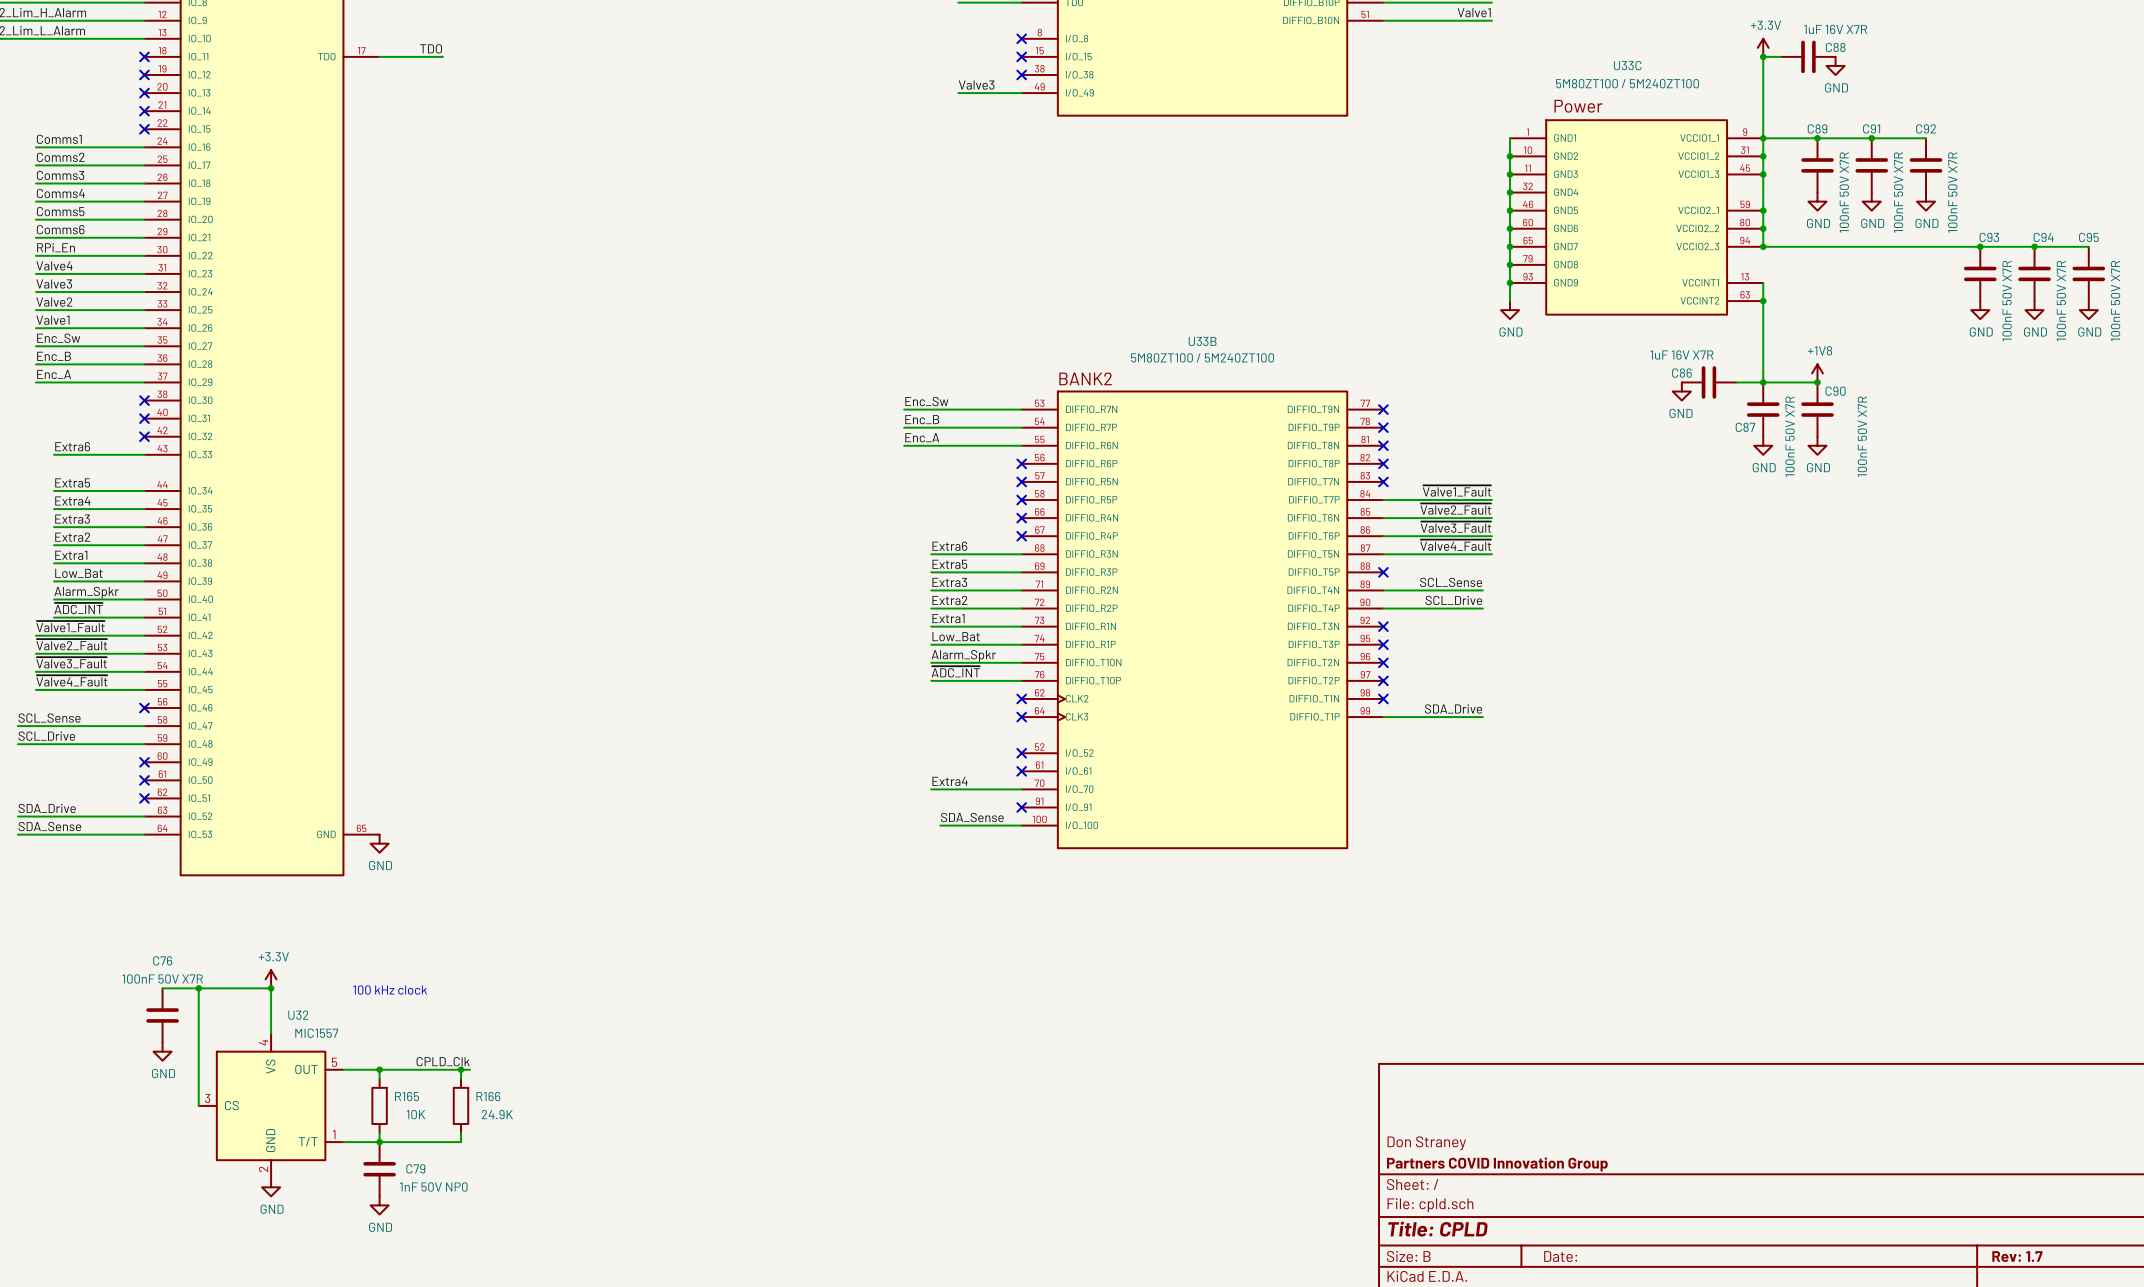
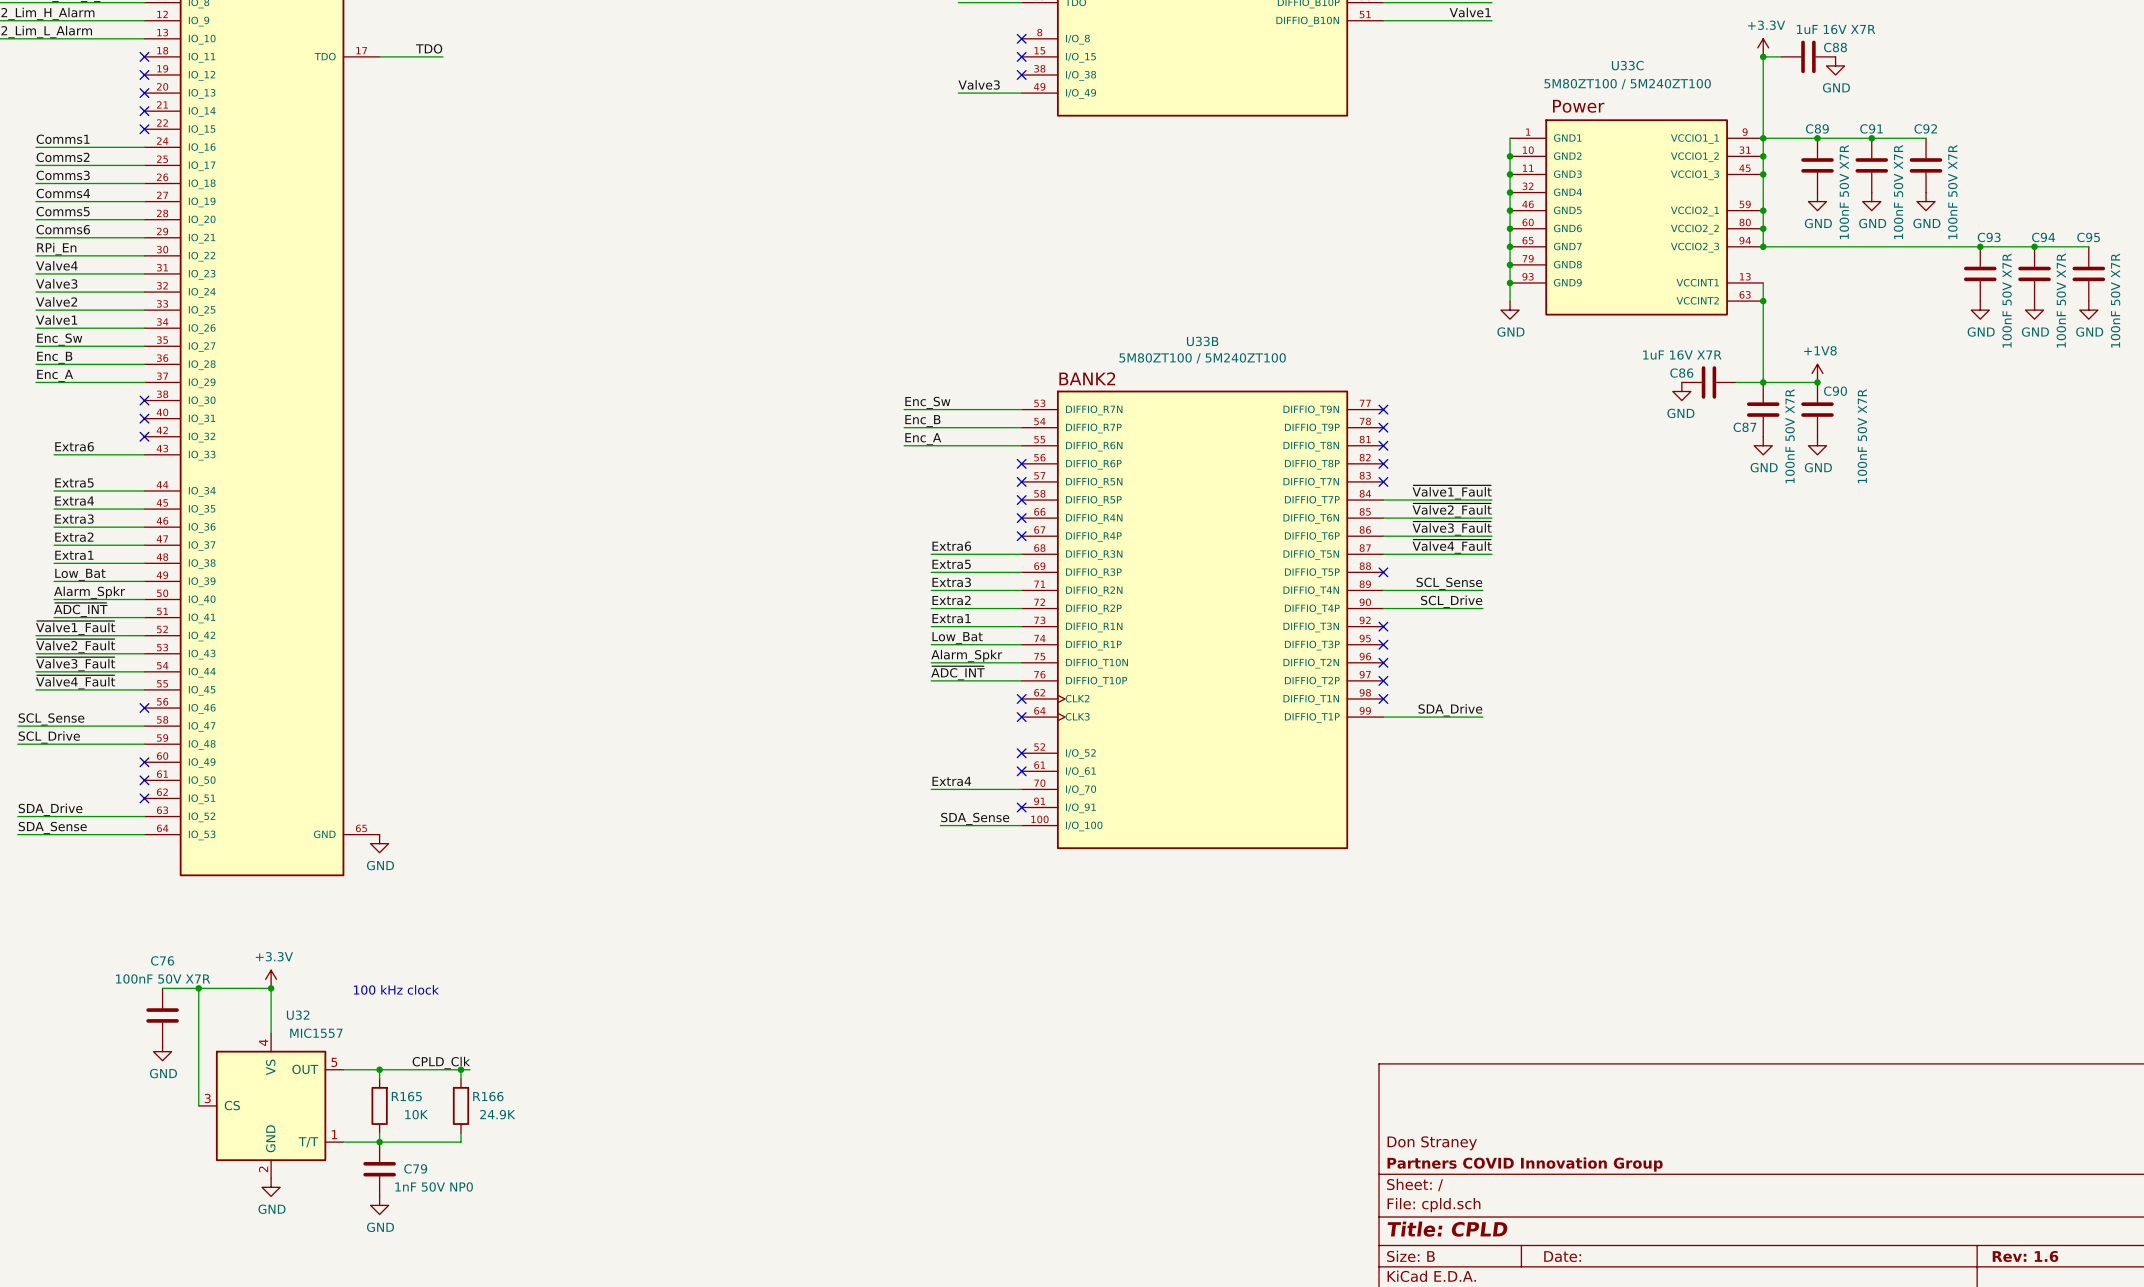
title block: Rev: 1.7 (2017, 1256) -> Rev: 1.6 (2025, 1256)

